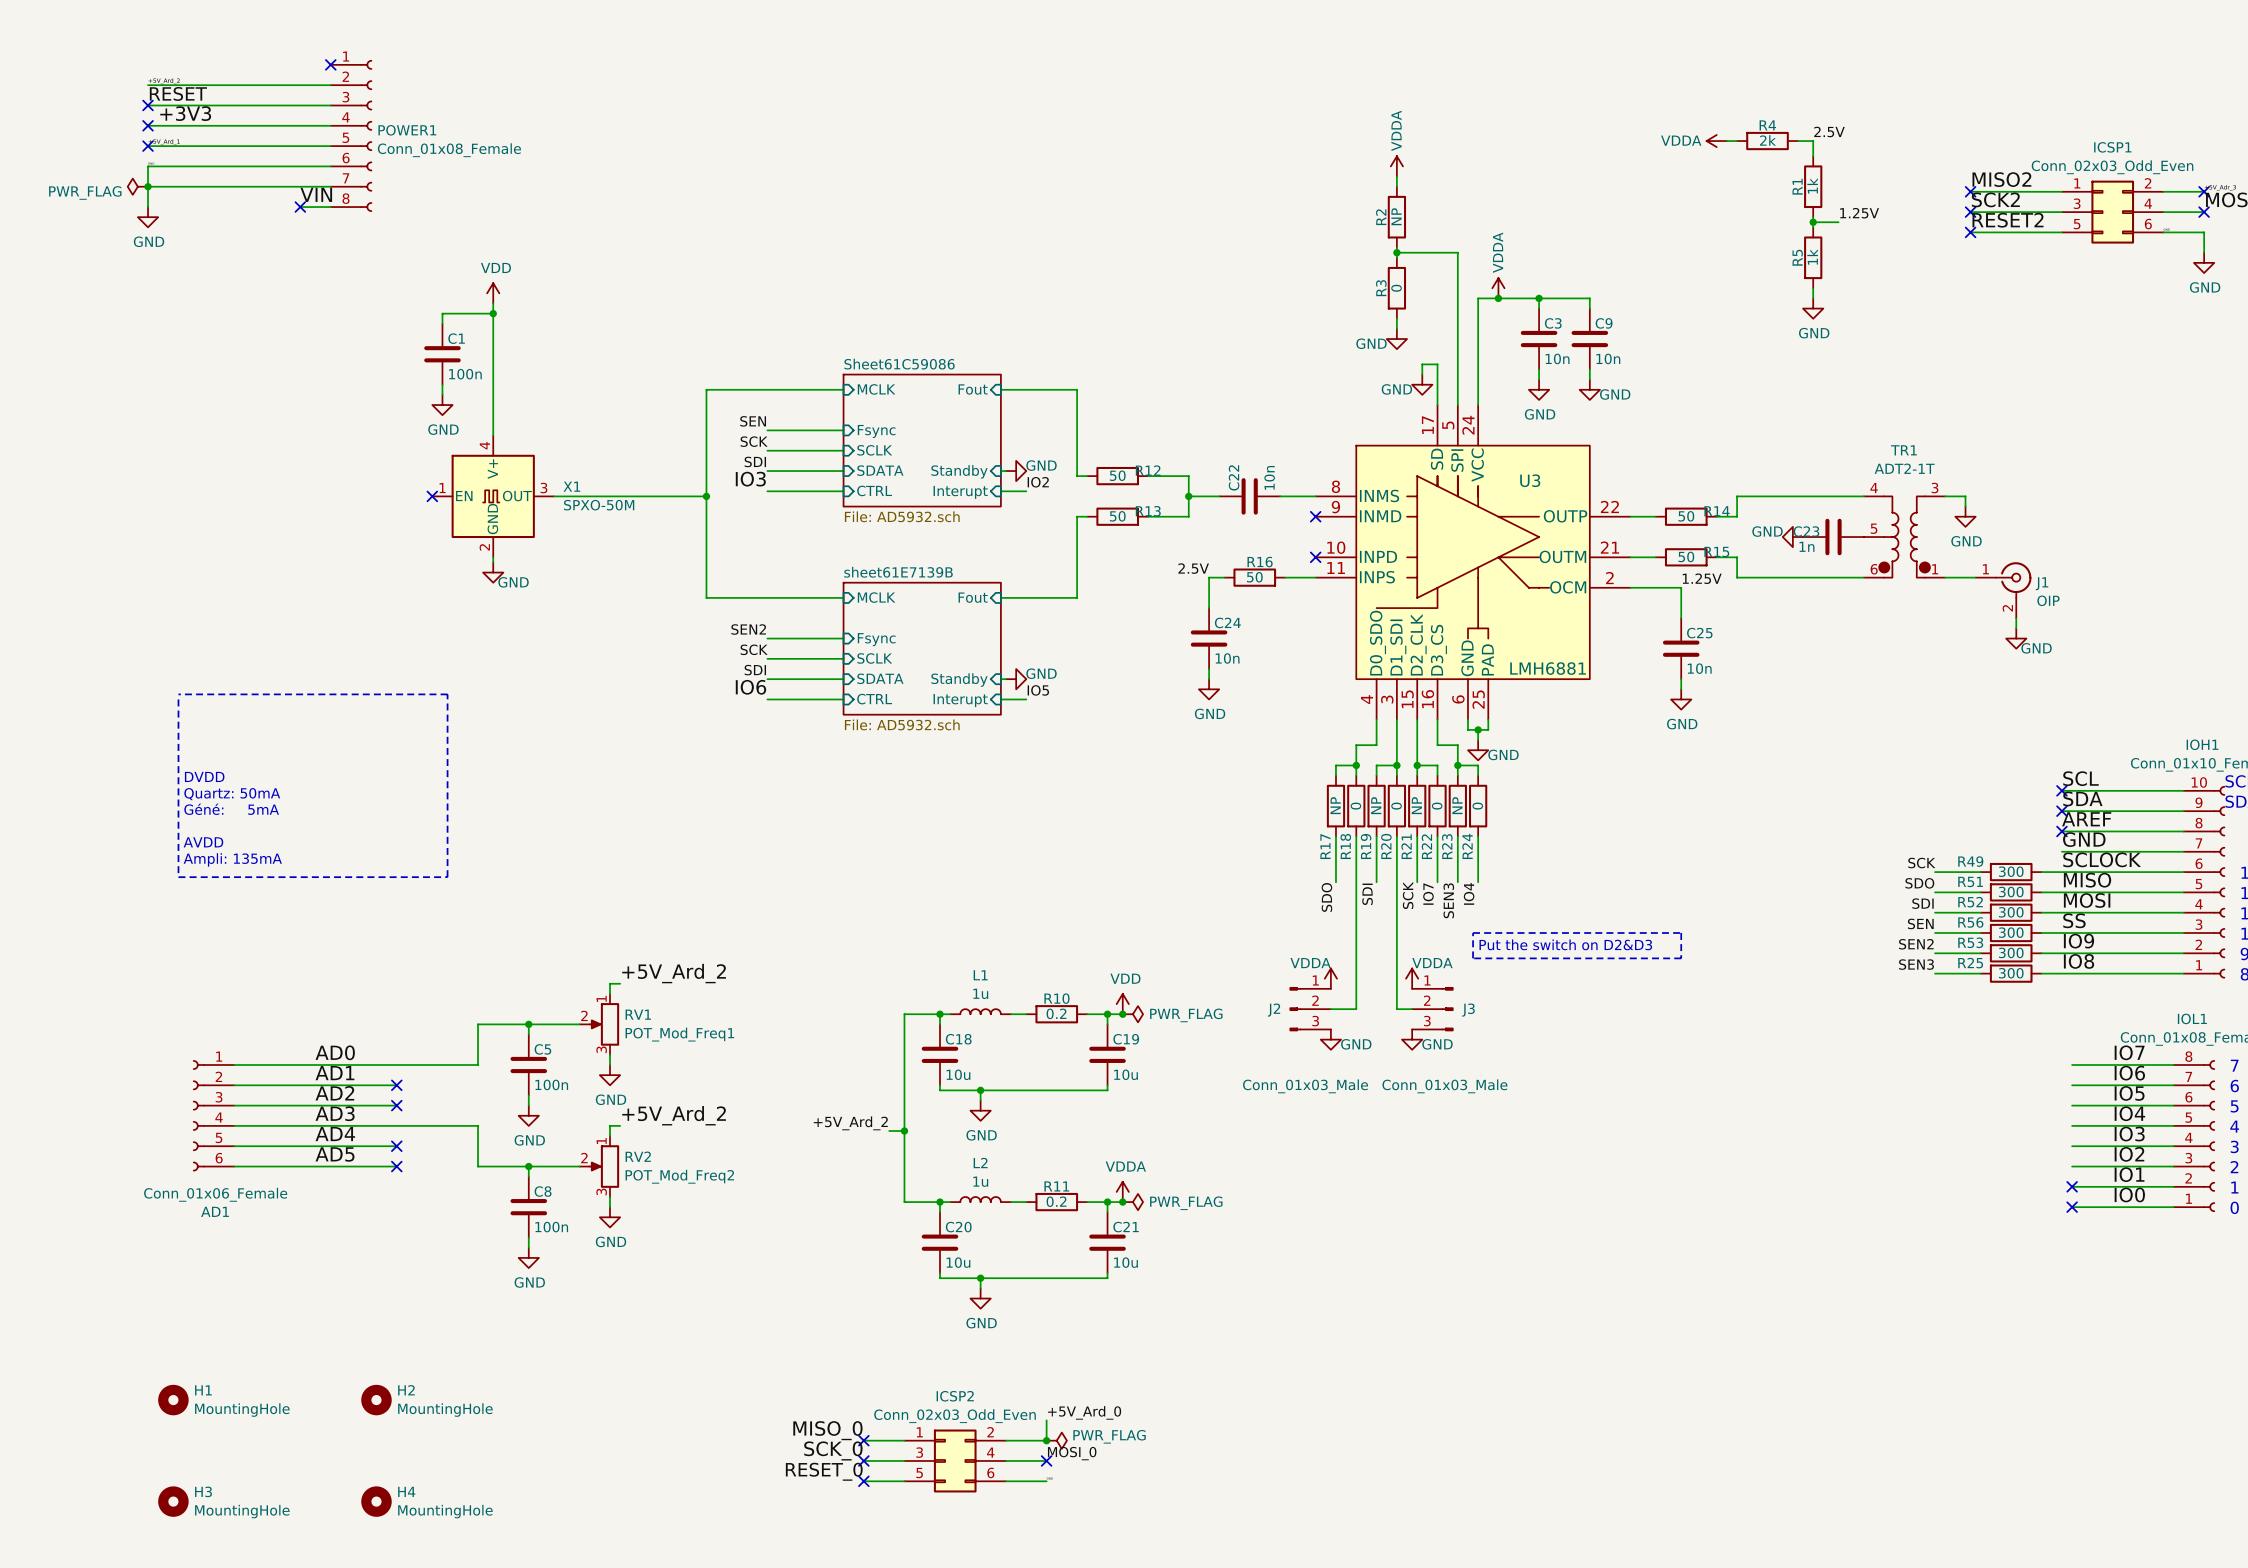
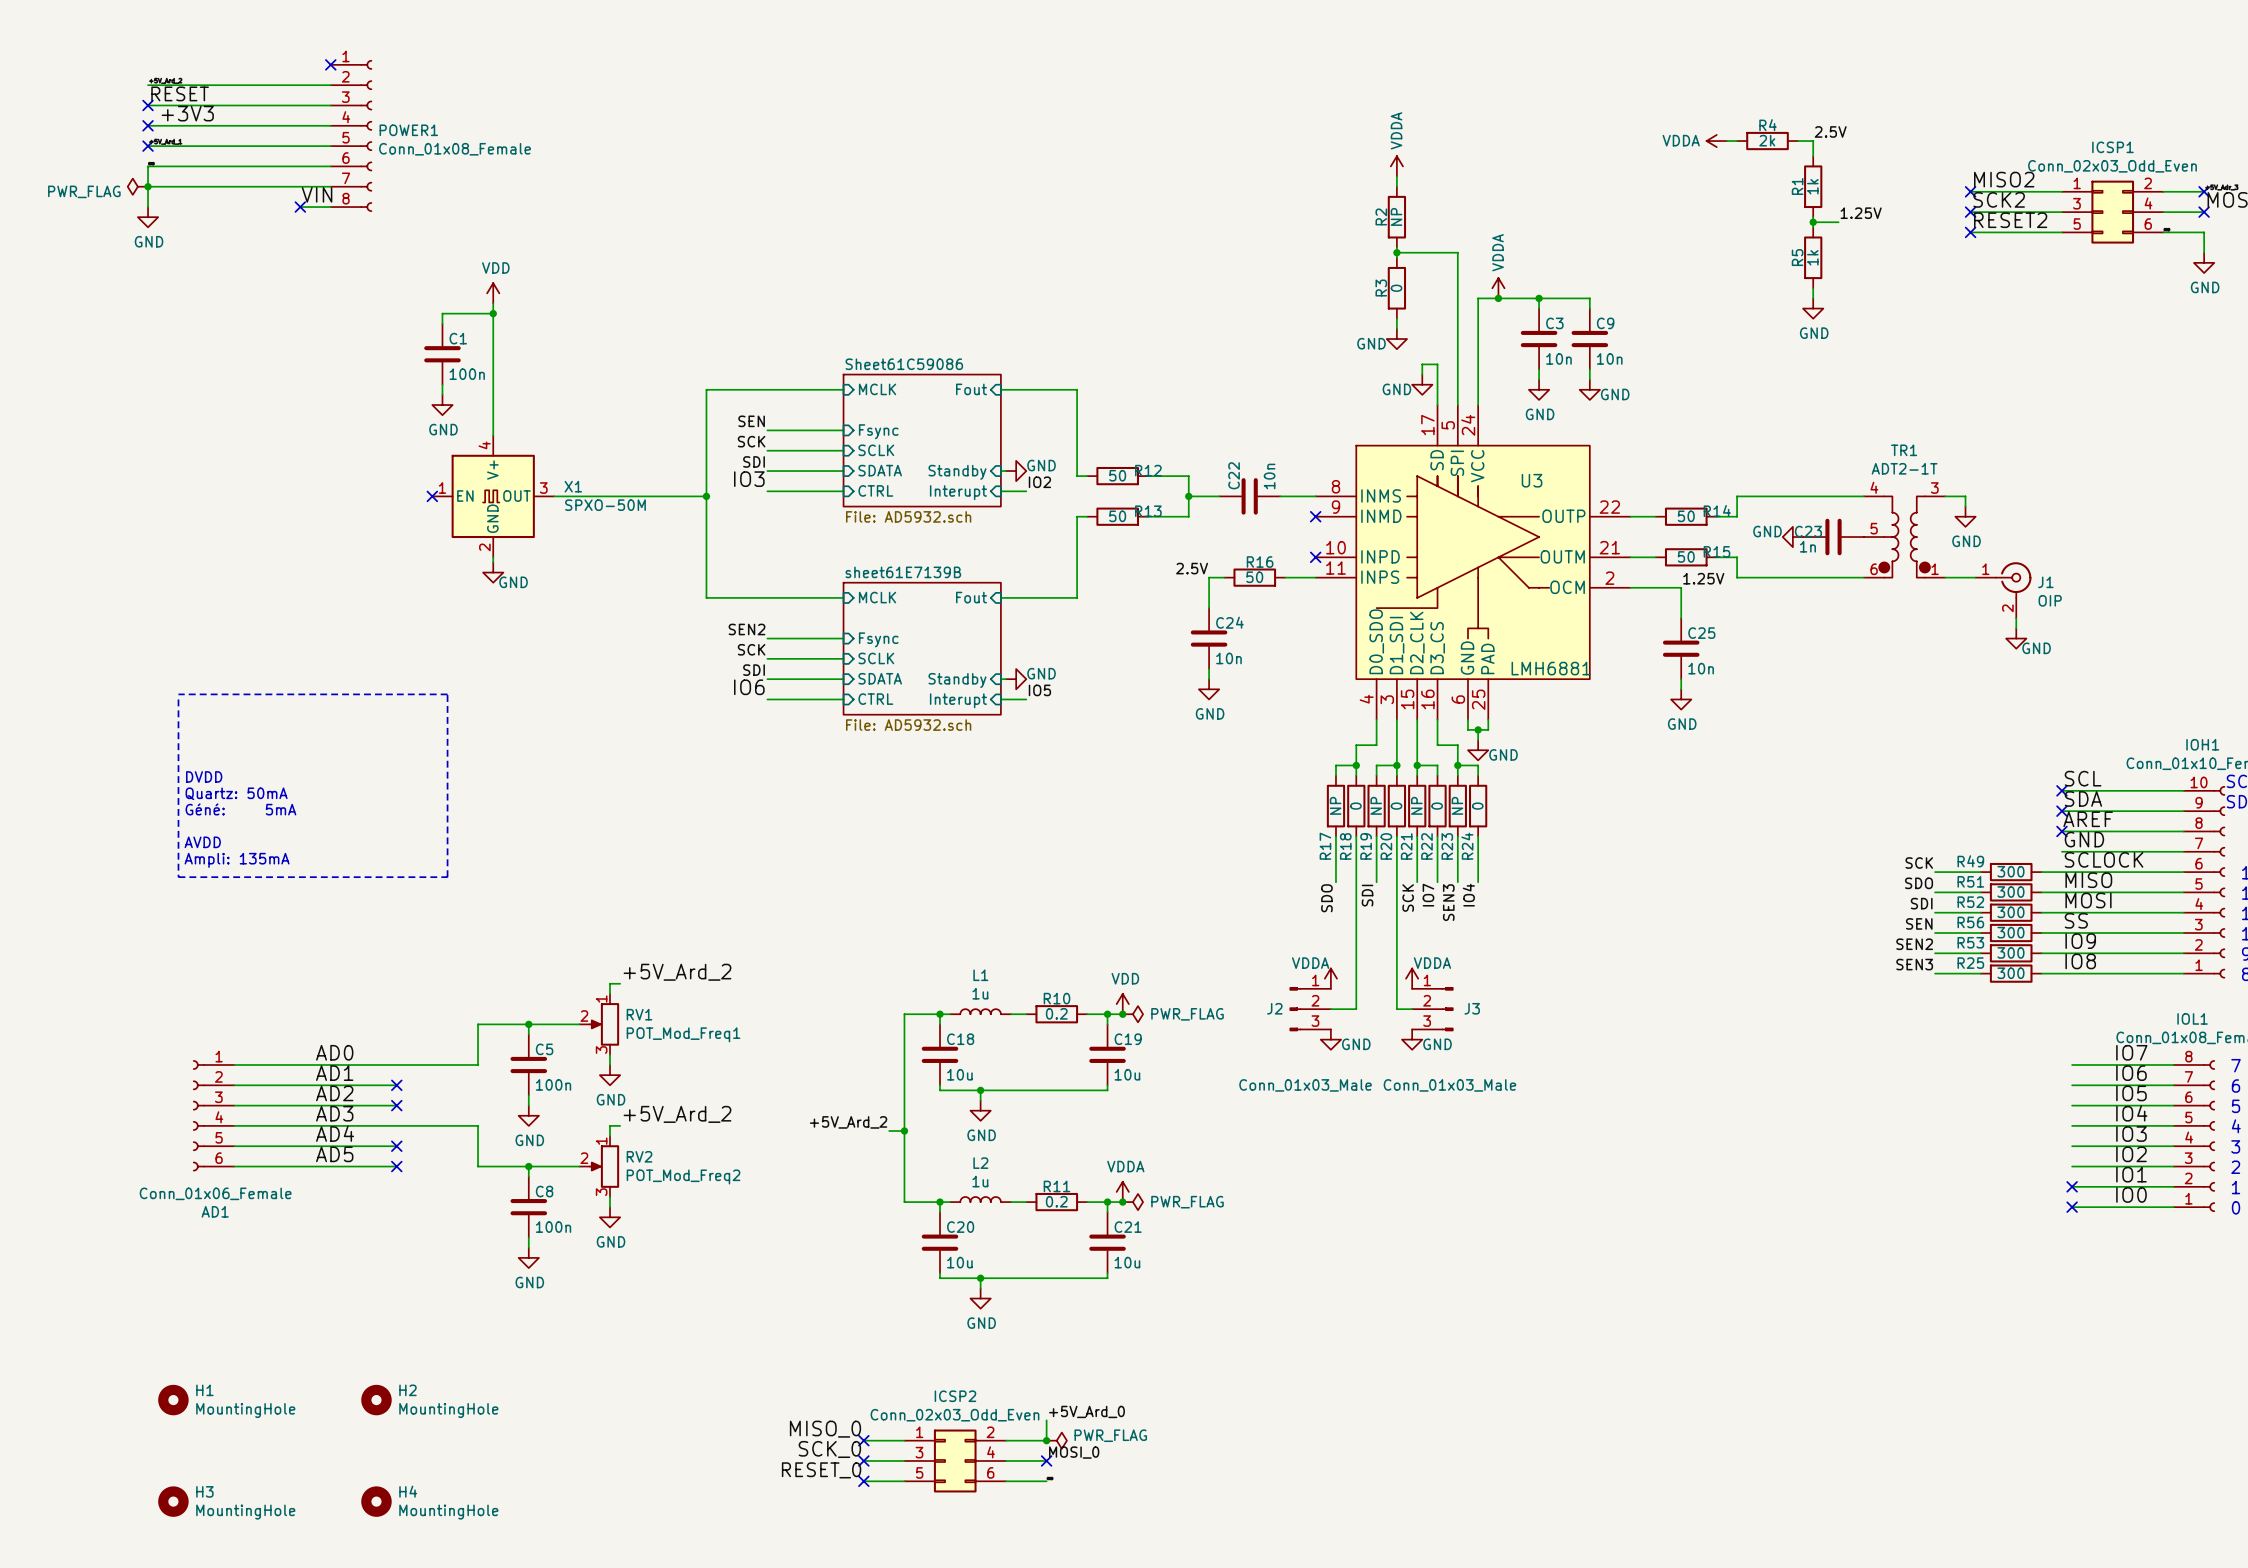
line: (1473, 933) (1681, 933) (1681, 958) (1473, 958) (1473, 933) -> none
text: Put the switch on D2&D3 (1565, 944) -> none

